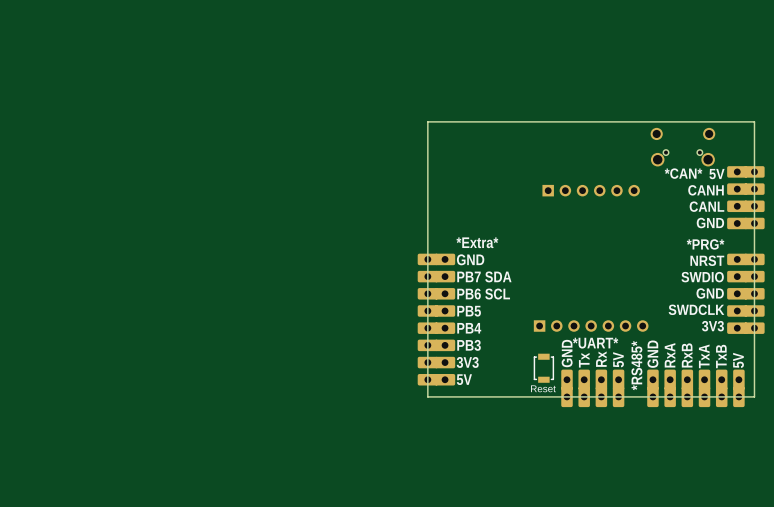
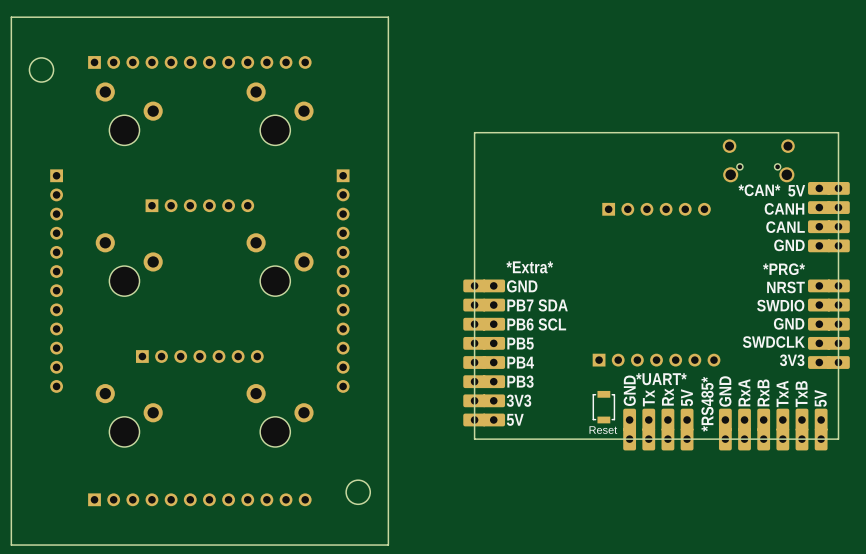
board edge: none -> (388, 17) (11, 17) (11, 545) (388, 545) (388, 17)
round board edge: none -> [28, 57, 55, 83]
part: none -> (199, 62)
part: none -> (129, 113)
part: none -> (280, 113)
part: none -> (199, 205)
part: none -> (129, 264)
part: none -> (280, 264)
part: none -> (56, 281)
part: none -> (343, 281)
part: none -> (199, 356)
part: none -> (129, 415)
part: none -> (280, 415)
round board edge: none -> [345, 479, 372, 506]
part: none -> (199, 499)

